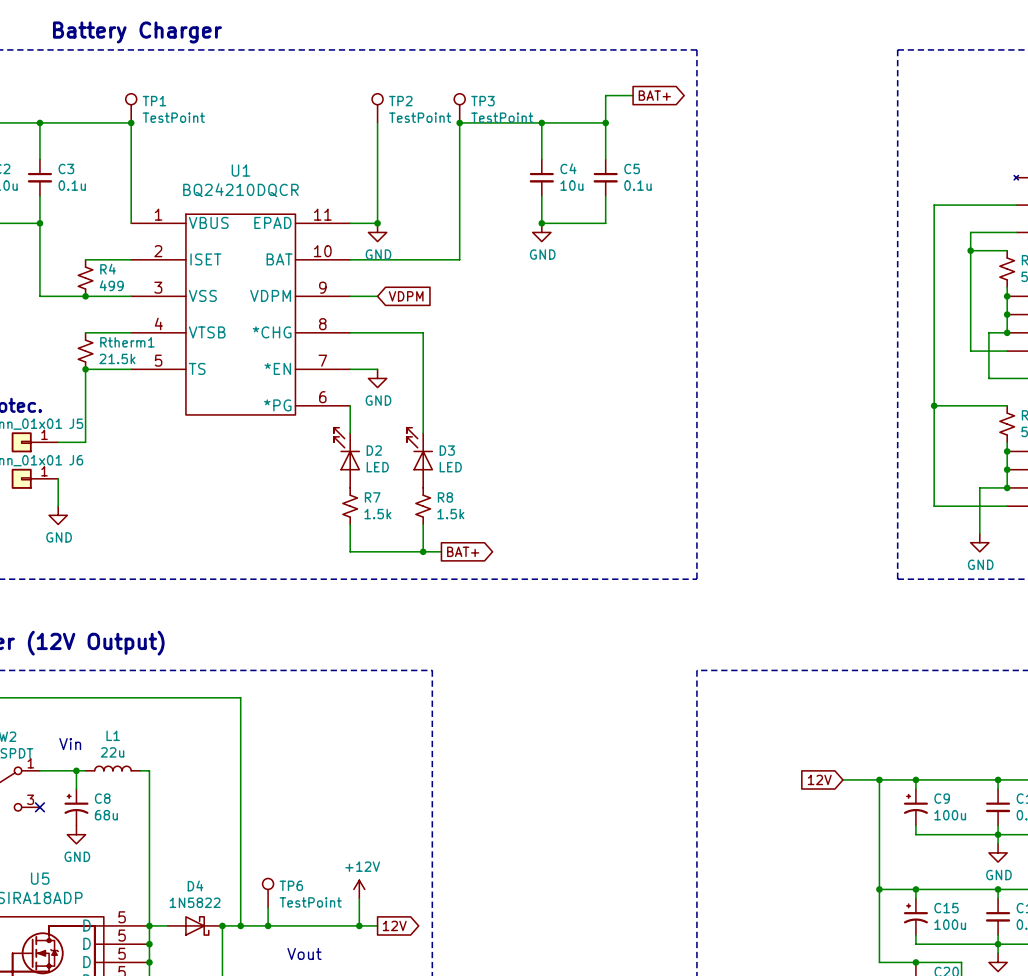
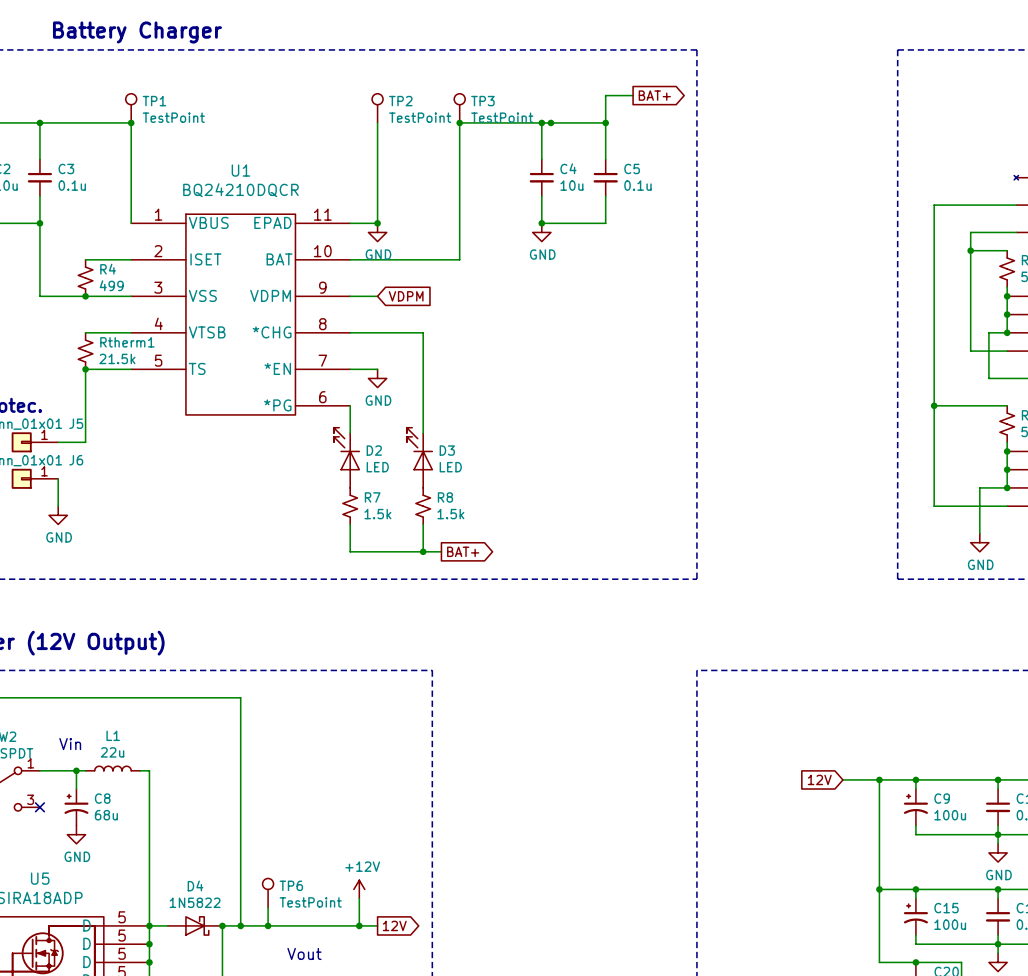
junction: none -> (550, 122)

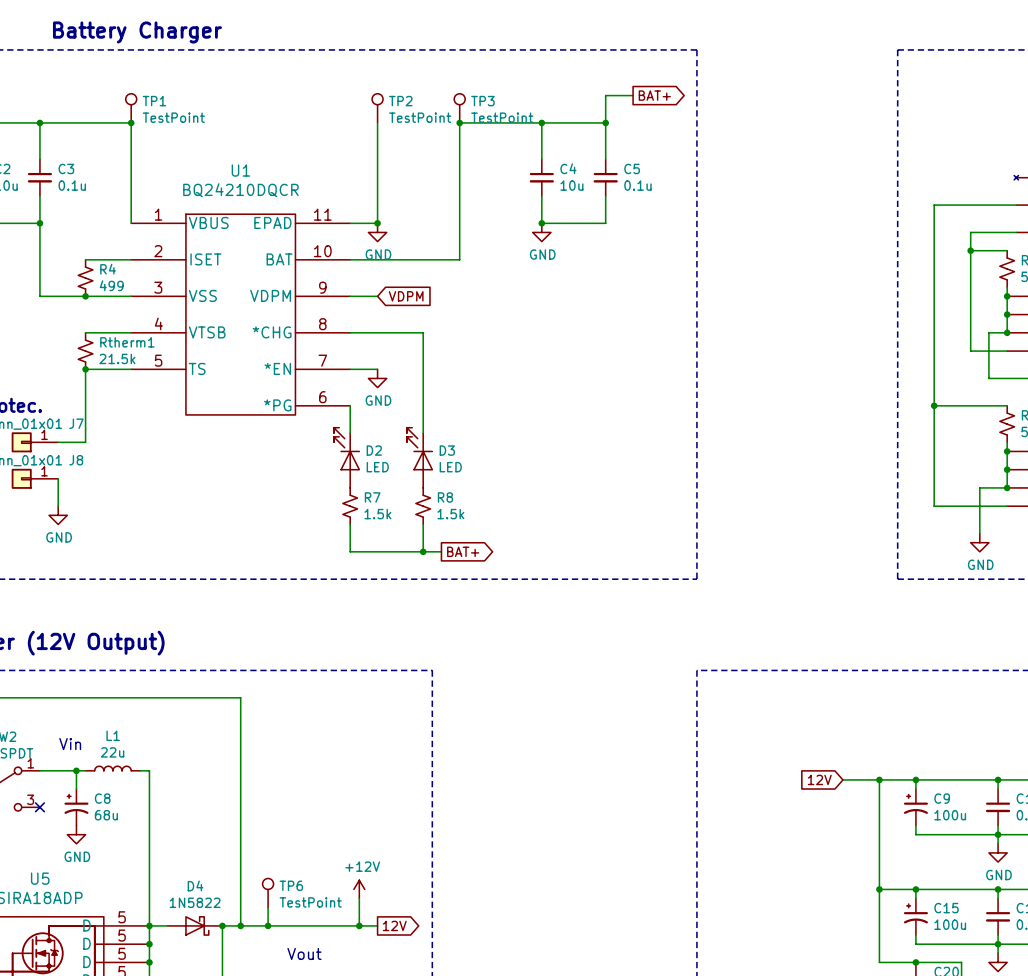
junction: (550, 122) -> none
J5 name: J5 (76, 423) -> J7 (76, 423)
J6 name: J6 (76, 460) -> J8 (76, 460)

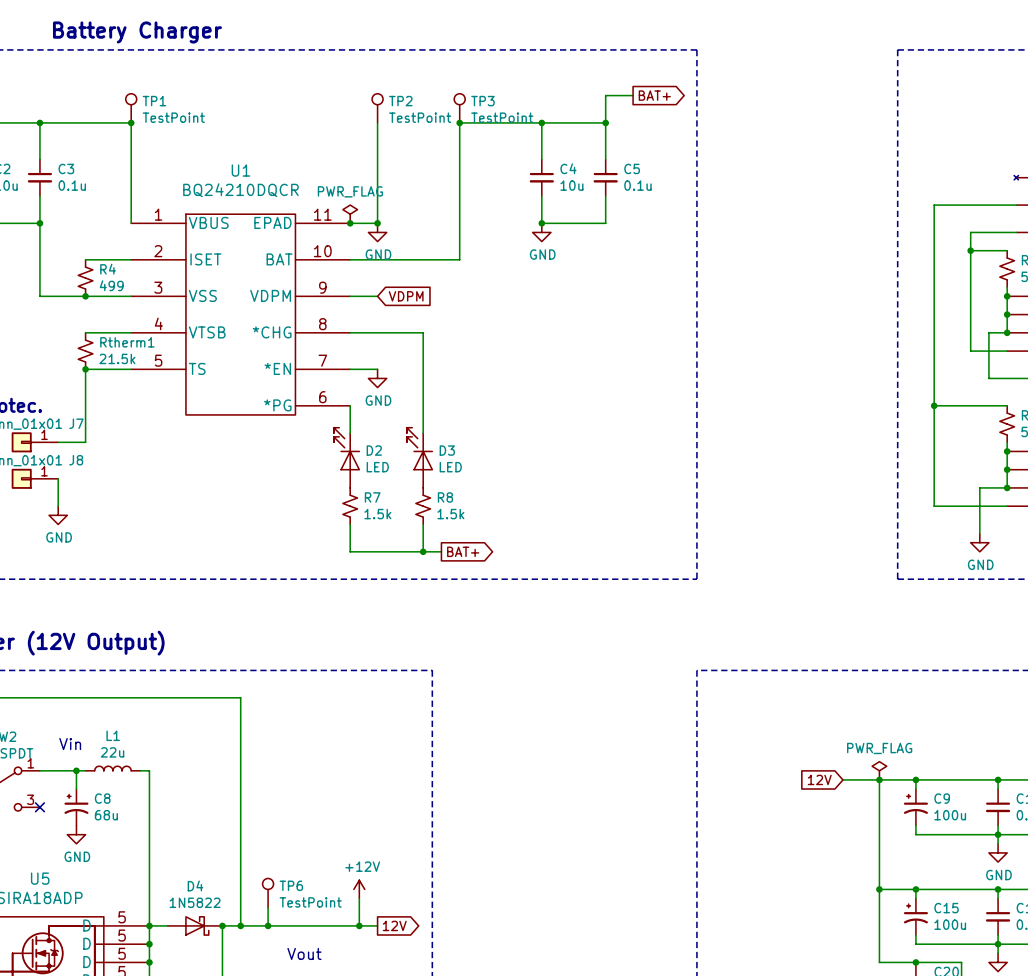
power symbol: none -> PWR_FLAG (350, 214)
junction: none -> (350, 223)
power symbol: none -> PWR_FLAG (879, 770)

